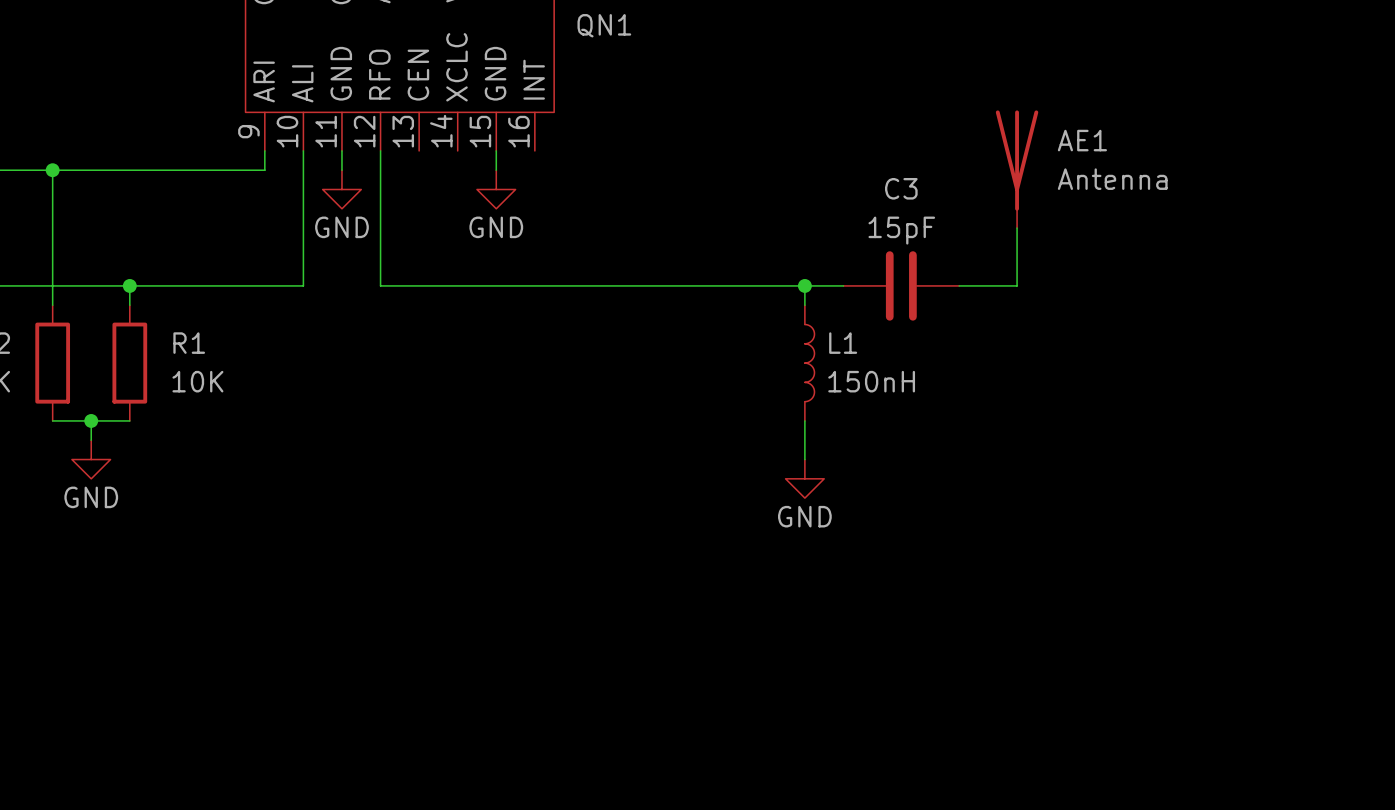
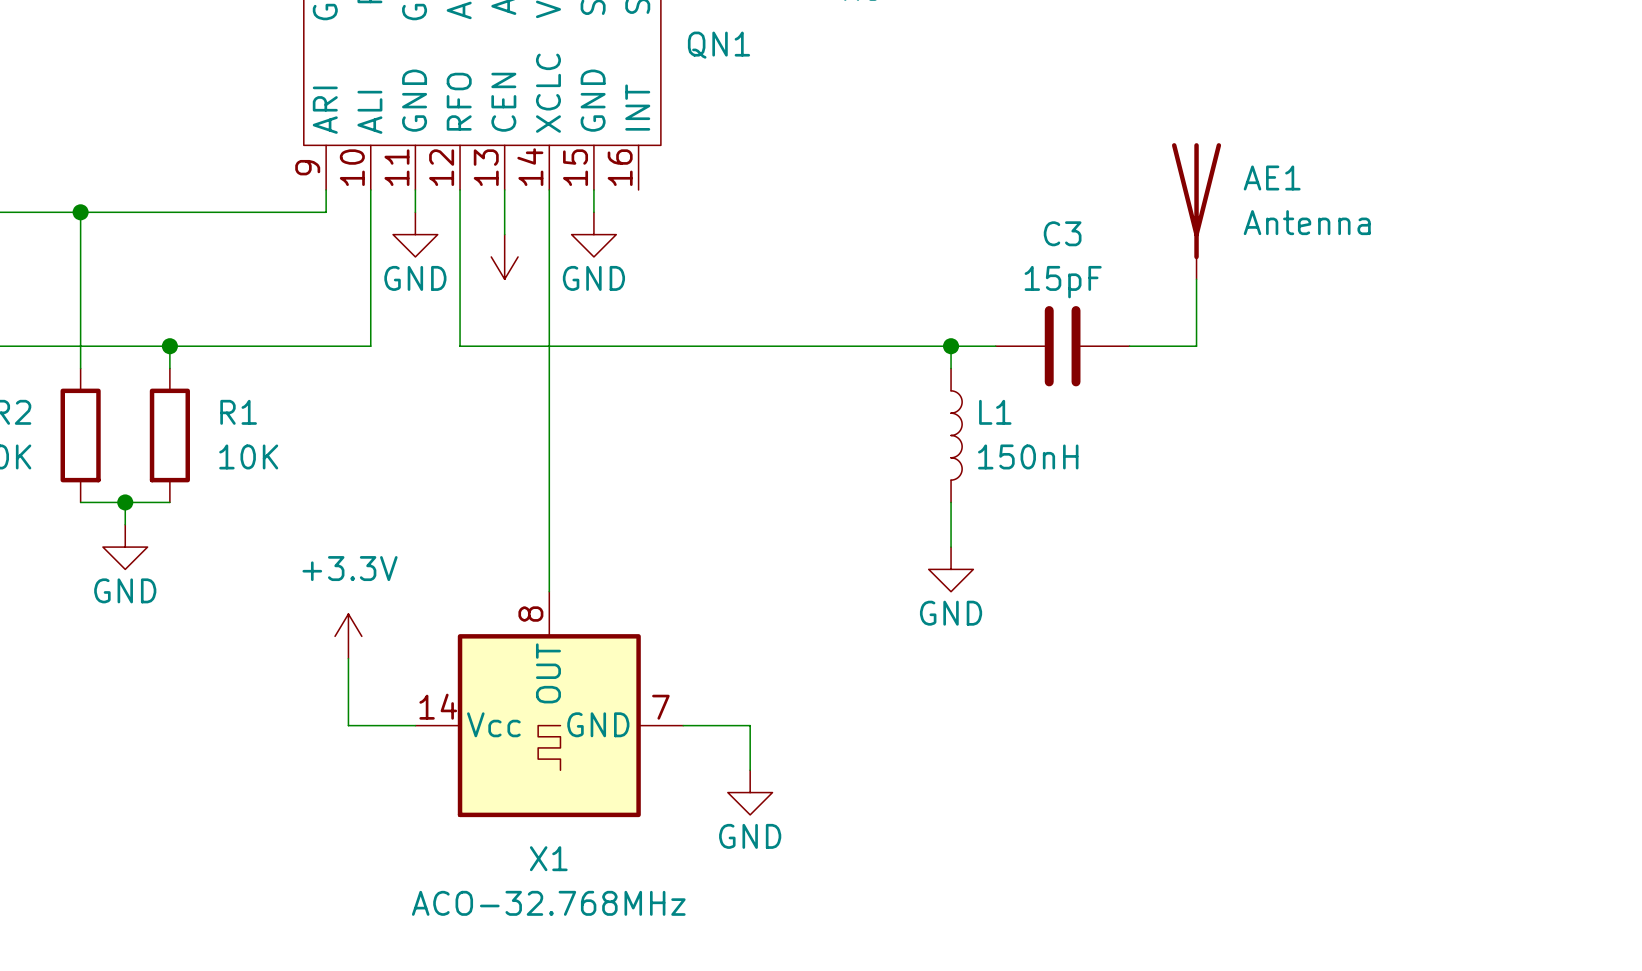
wire: none -> (504, 189) (504, 234)
wire: none -> (549, 189) (549, 591)
power symbol: none -> (504, 256)
power symbol: none -> +3.3V (348, 636)
wire: none -> (348, 658) (348, 725) (415, 725)
X1: none -> ACO-32.768MHz (549, 704)
wire: none -> (683, 725) (750, 725) (750, 770)
power symbol: none -> GND (750, 792)

